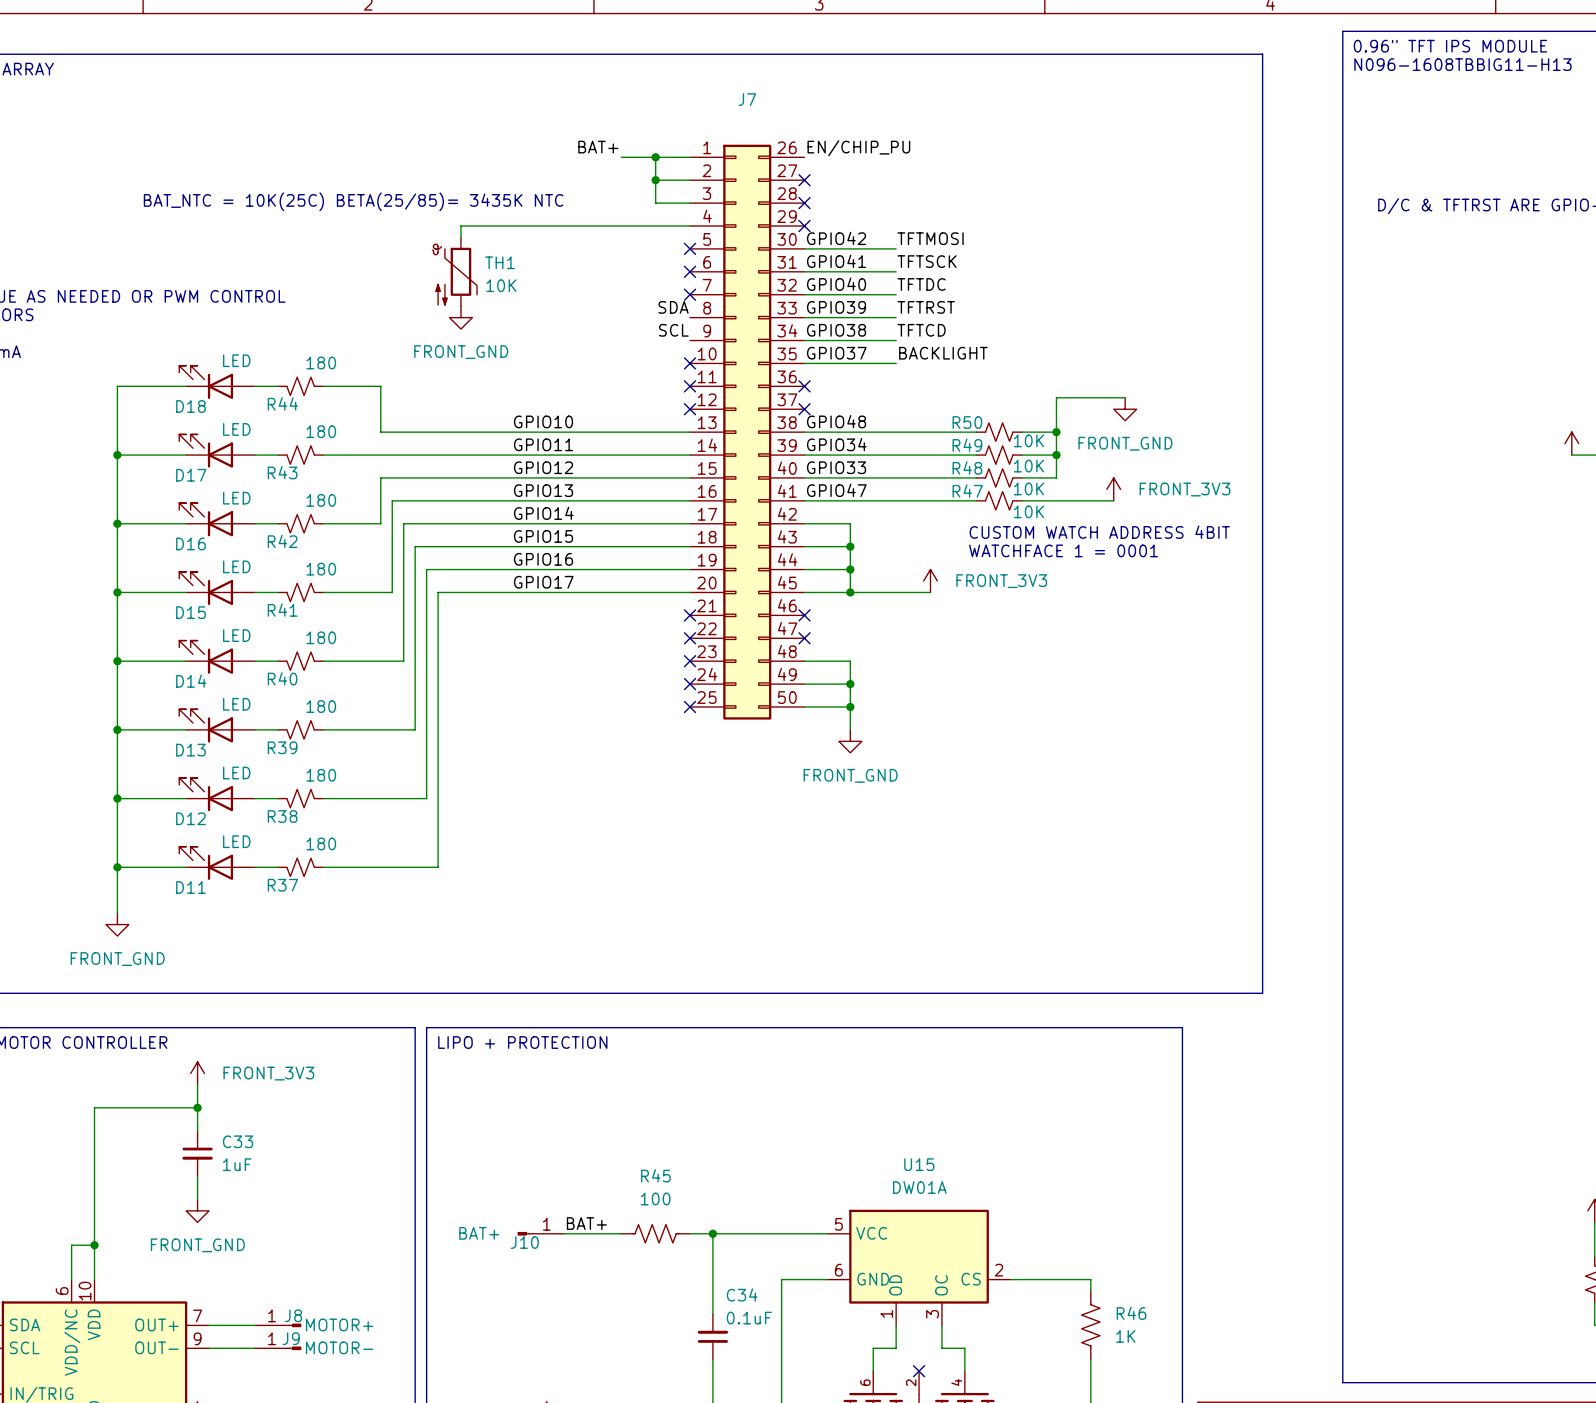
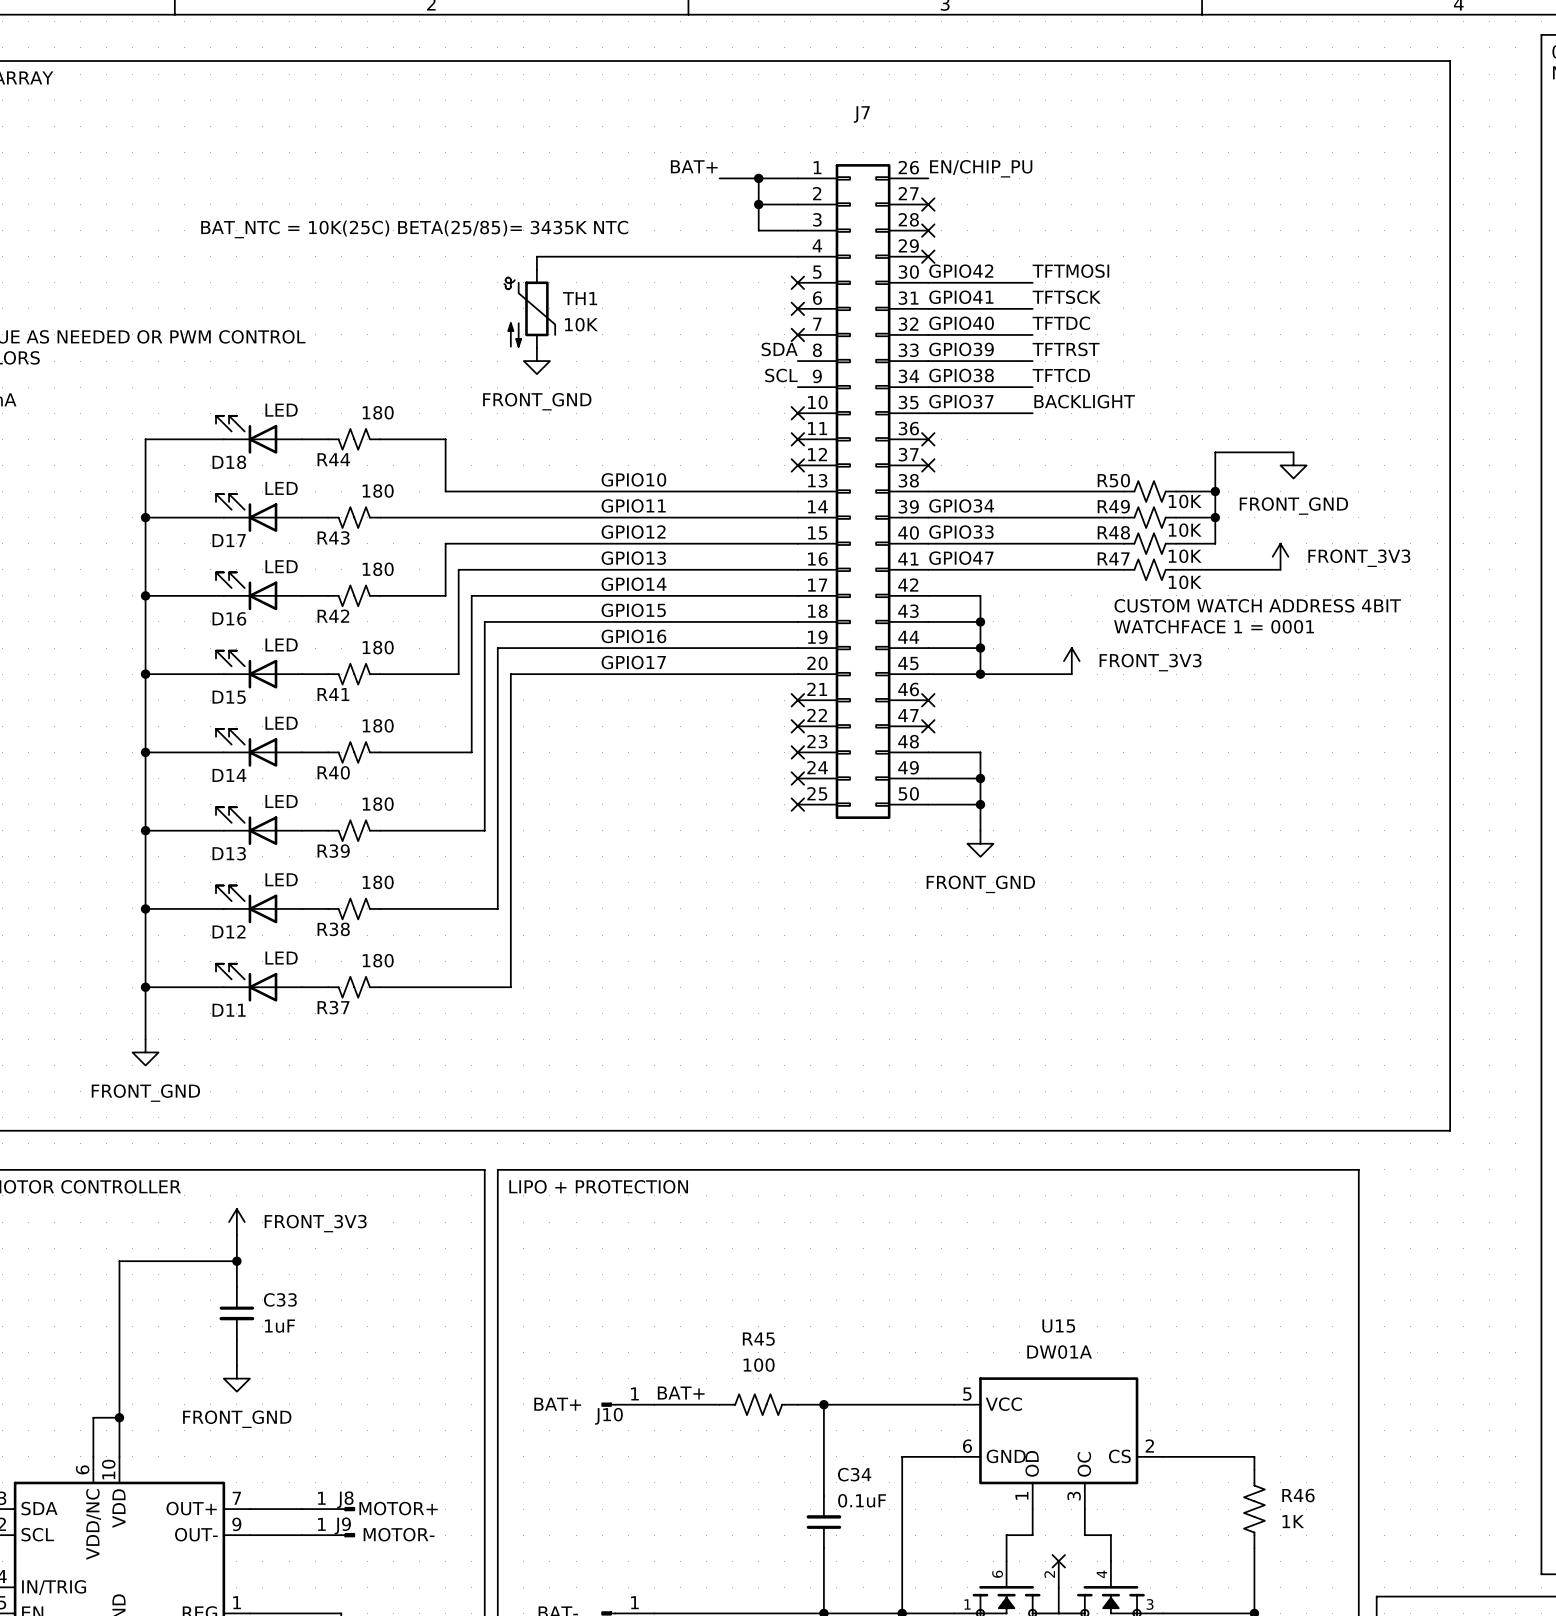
label: GPIO48 (836, 421) -> none

